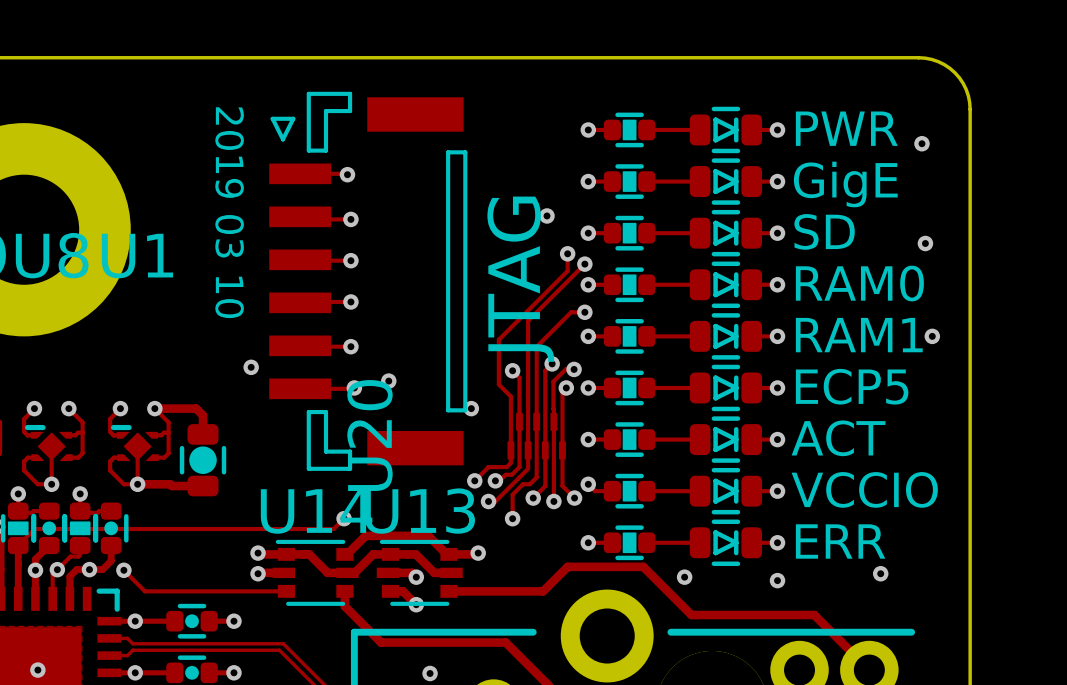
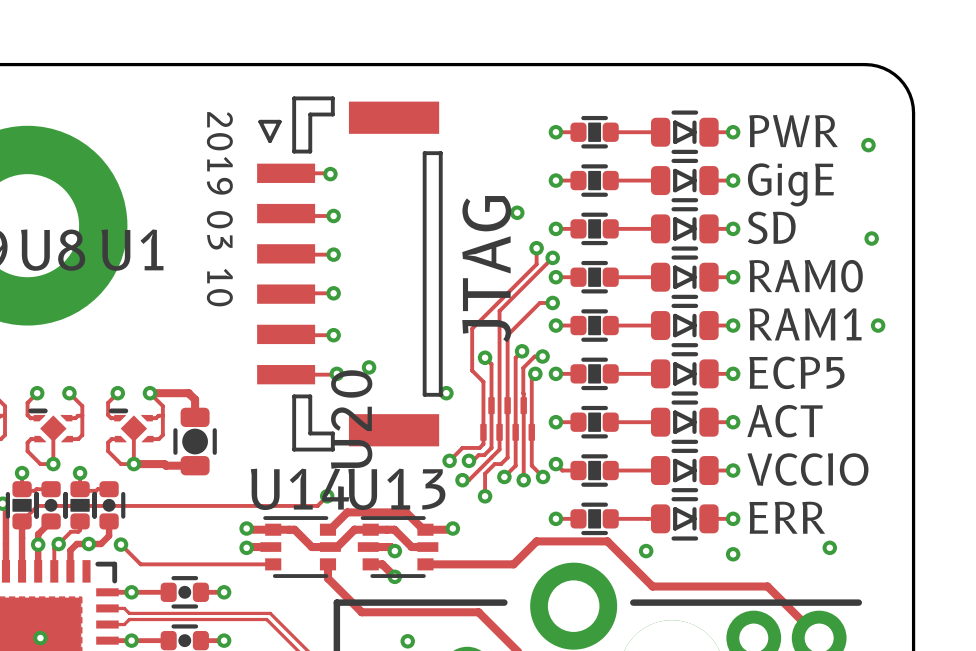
via: (251, 367) -> none

